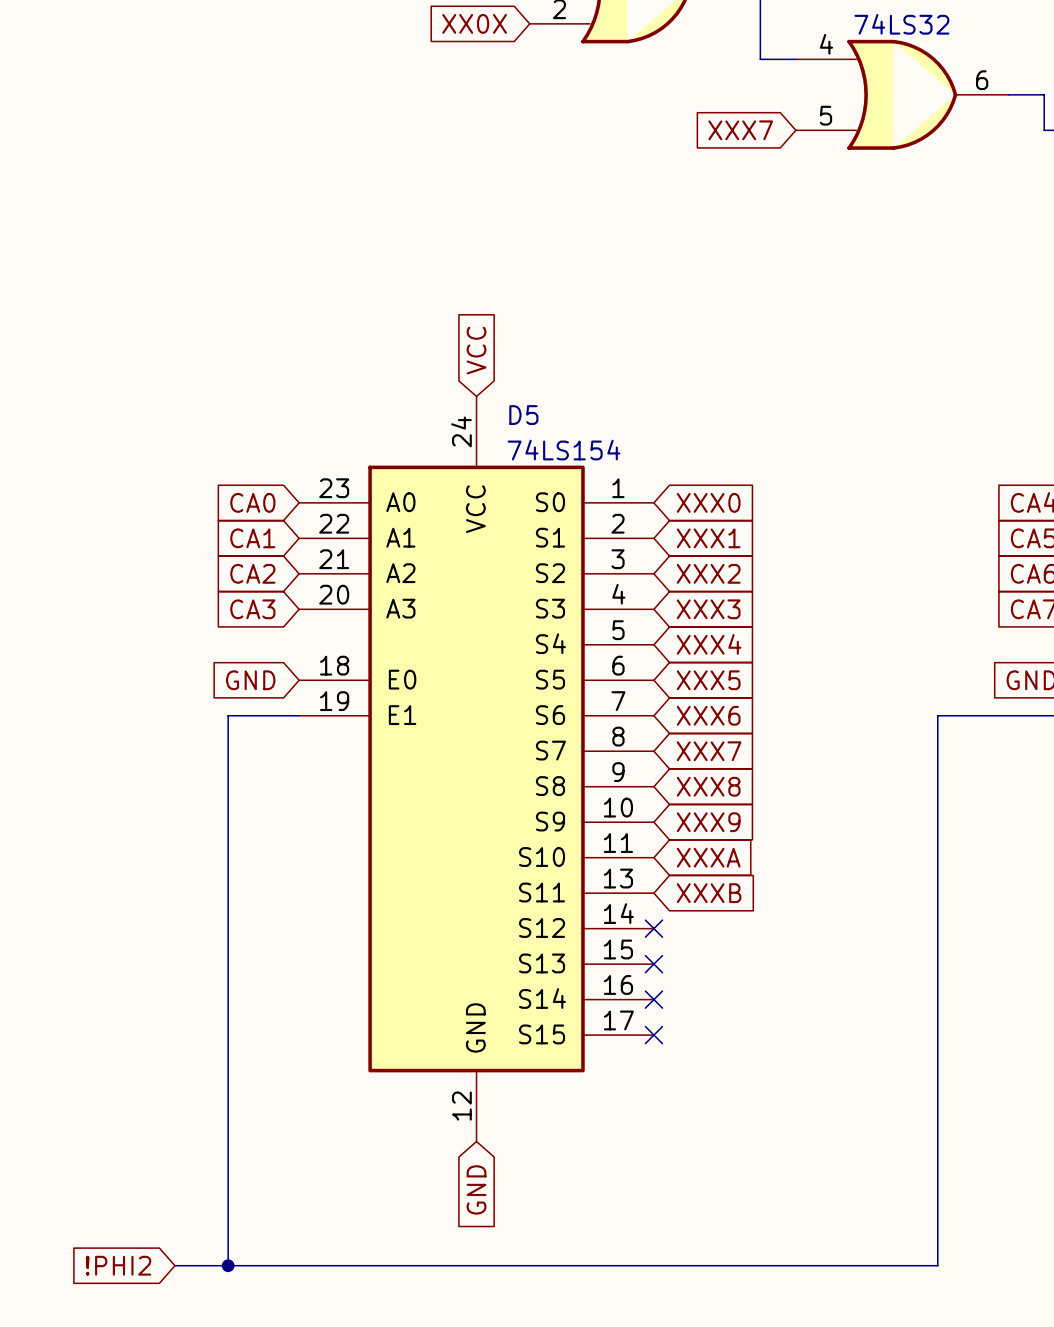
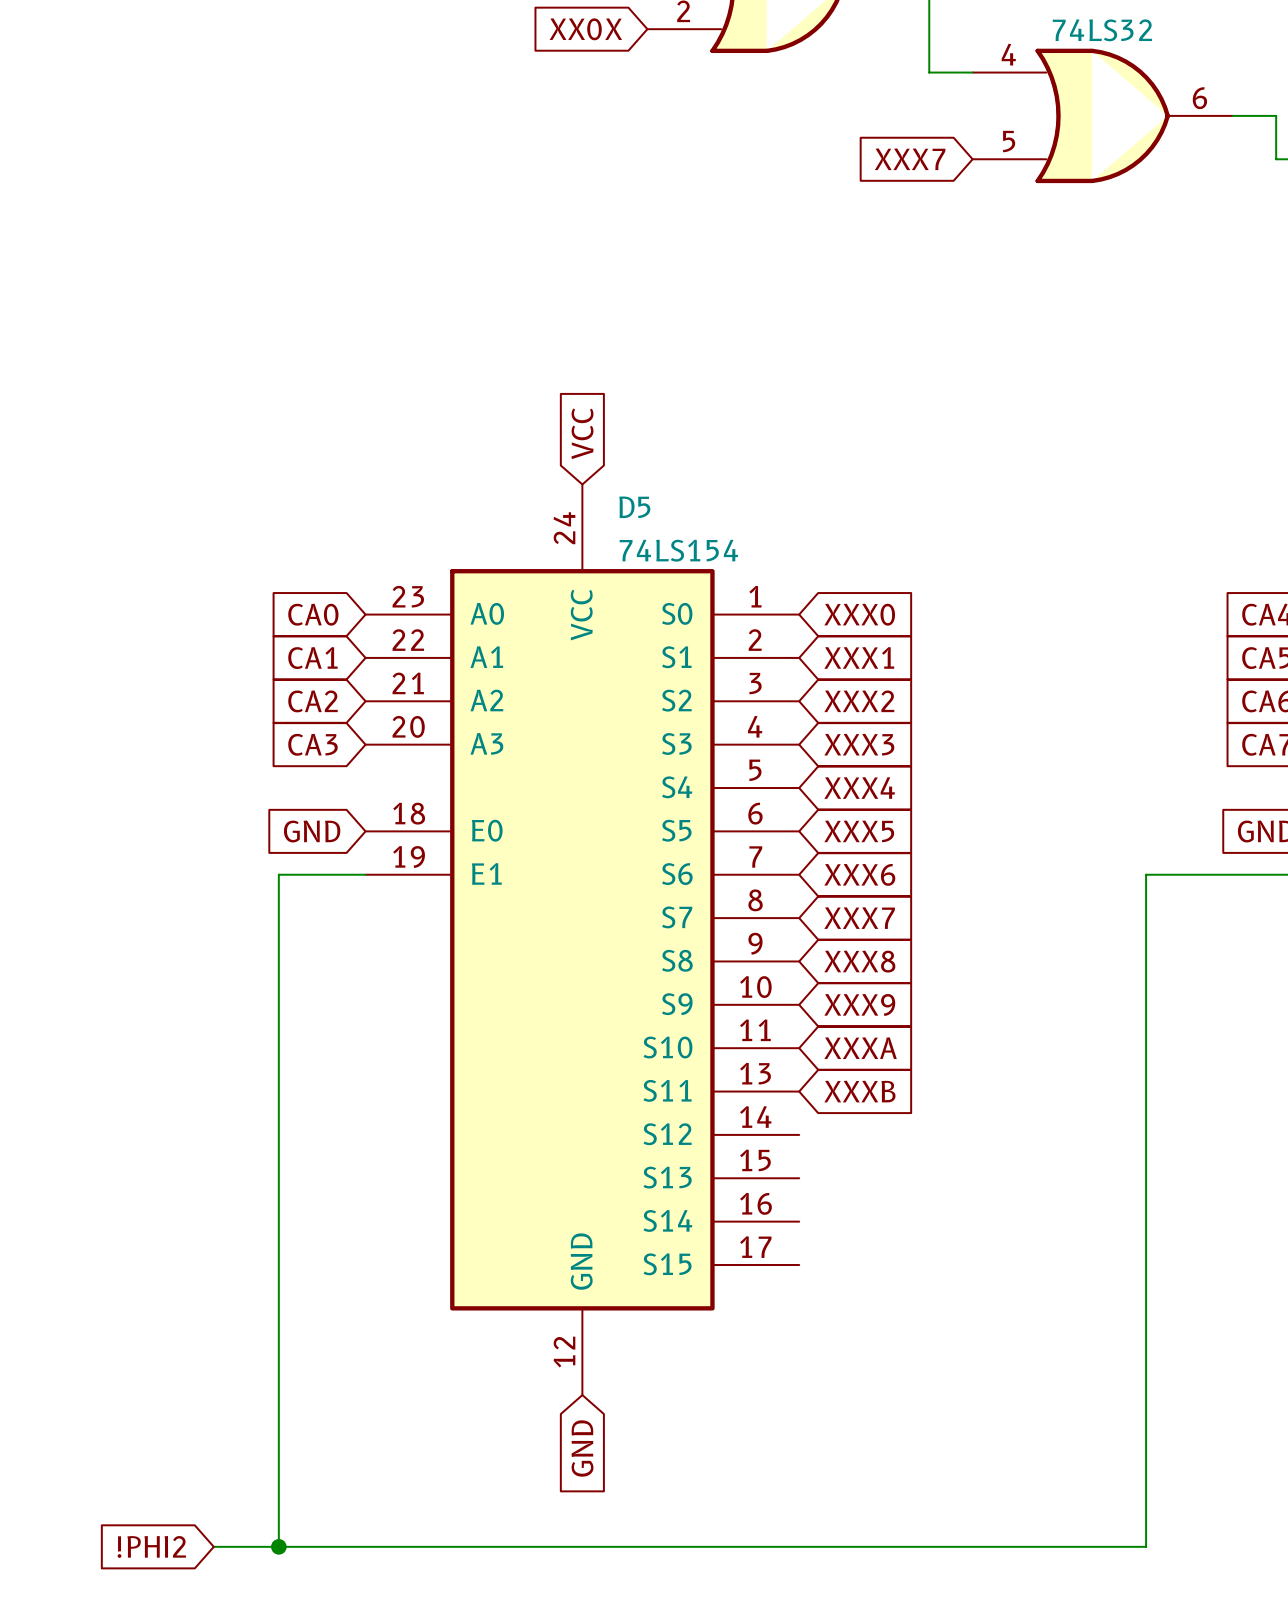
no-connect mark: (653, 928) -> none
no-connect mark: (653, 964) -> none
no-connect mark: (653, 999) -> none
no-connect mark: (653, 1035) -> none

